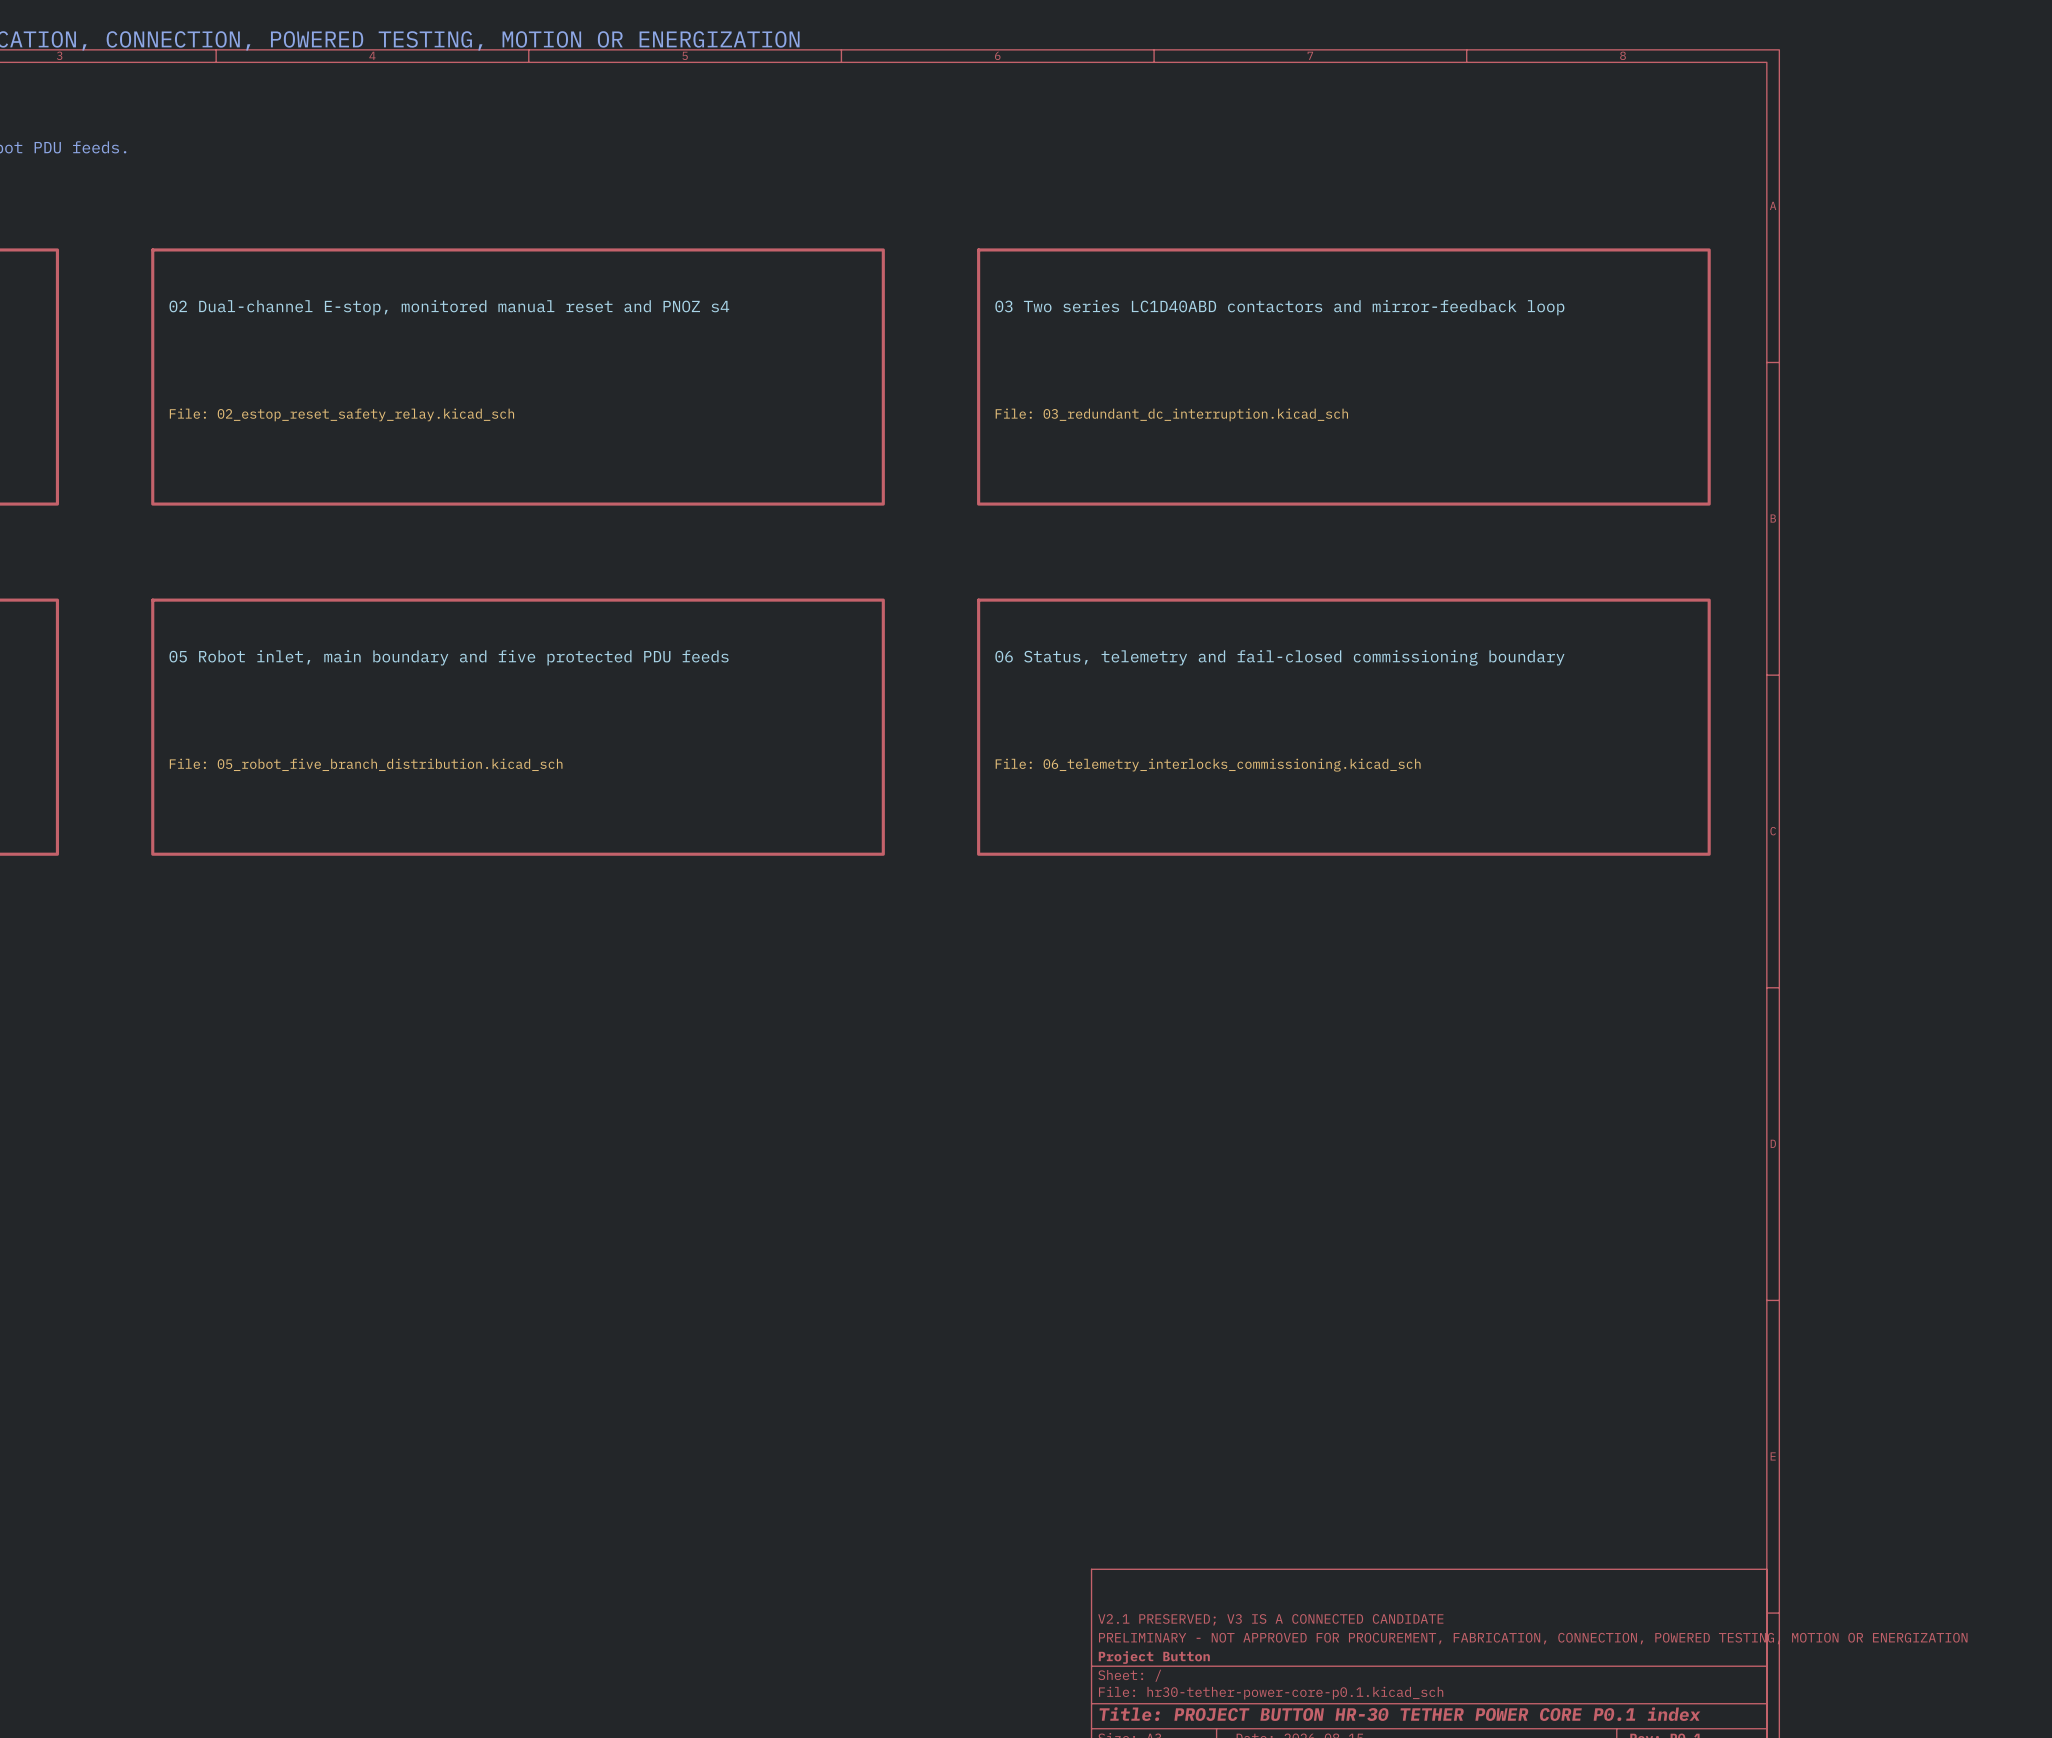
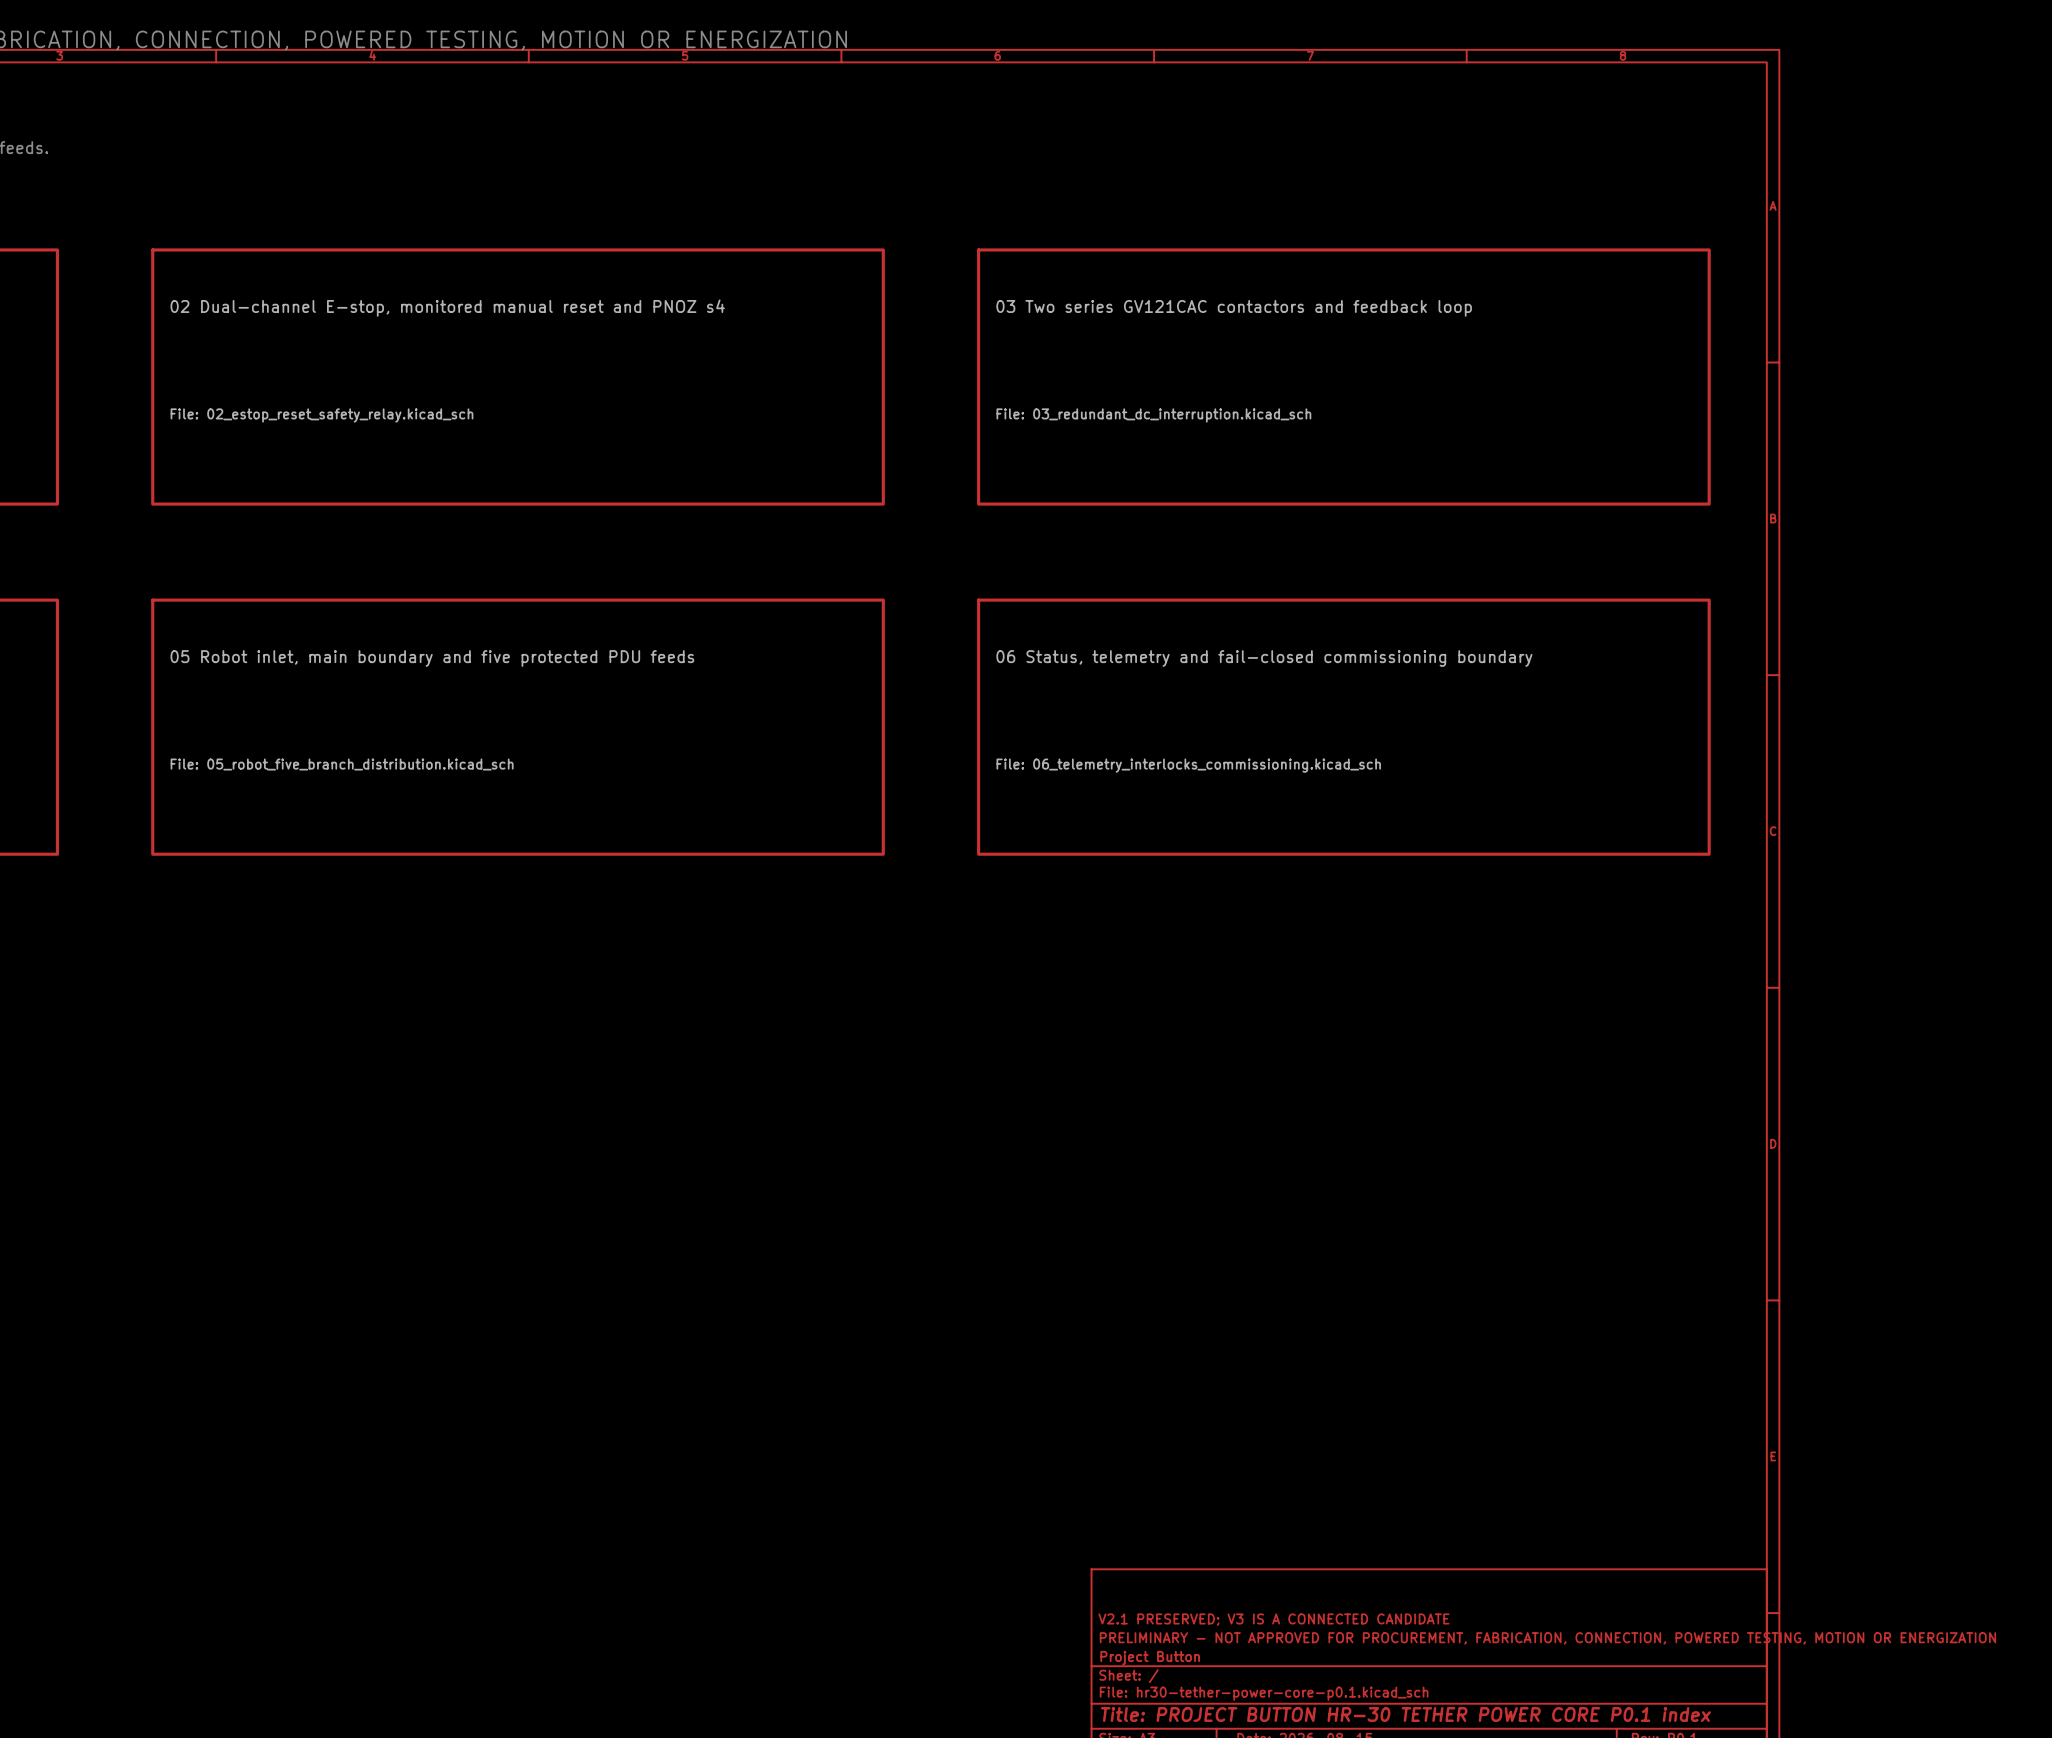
sheet 03 Two series LC1D40ABD contactors and mirror-feedback loop name: 03 Two series LC1D40ABD contactors and mirror-feedback loop (1279, 307) -> 03 Two series GV121CAC contactors and feedback loop (1234, 308)

